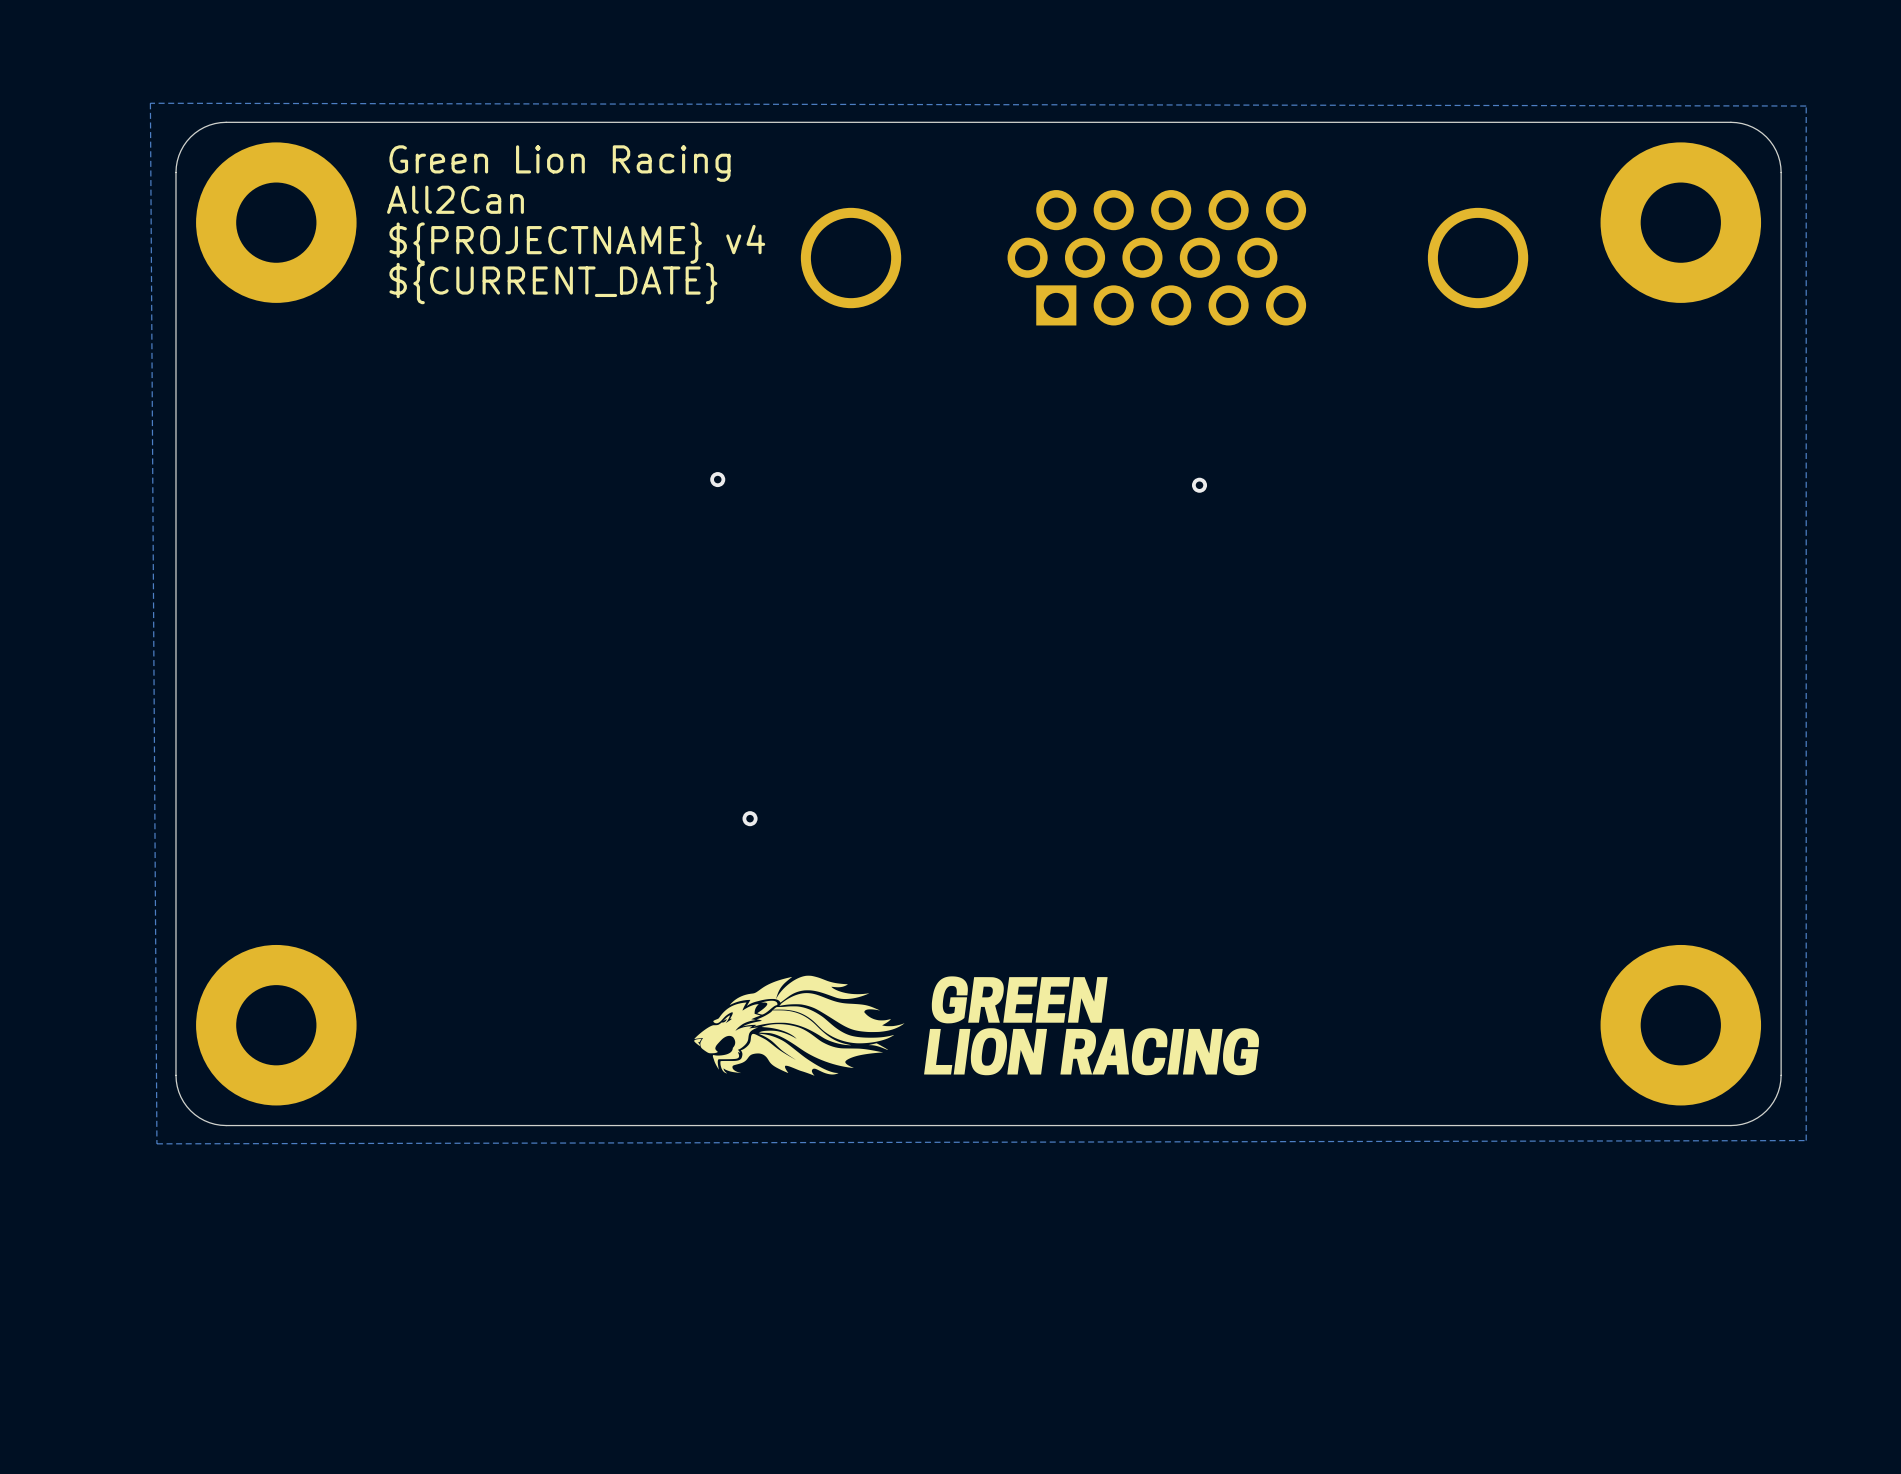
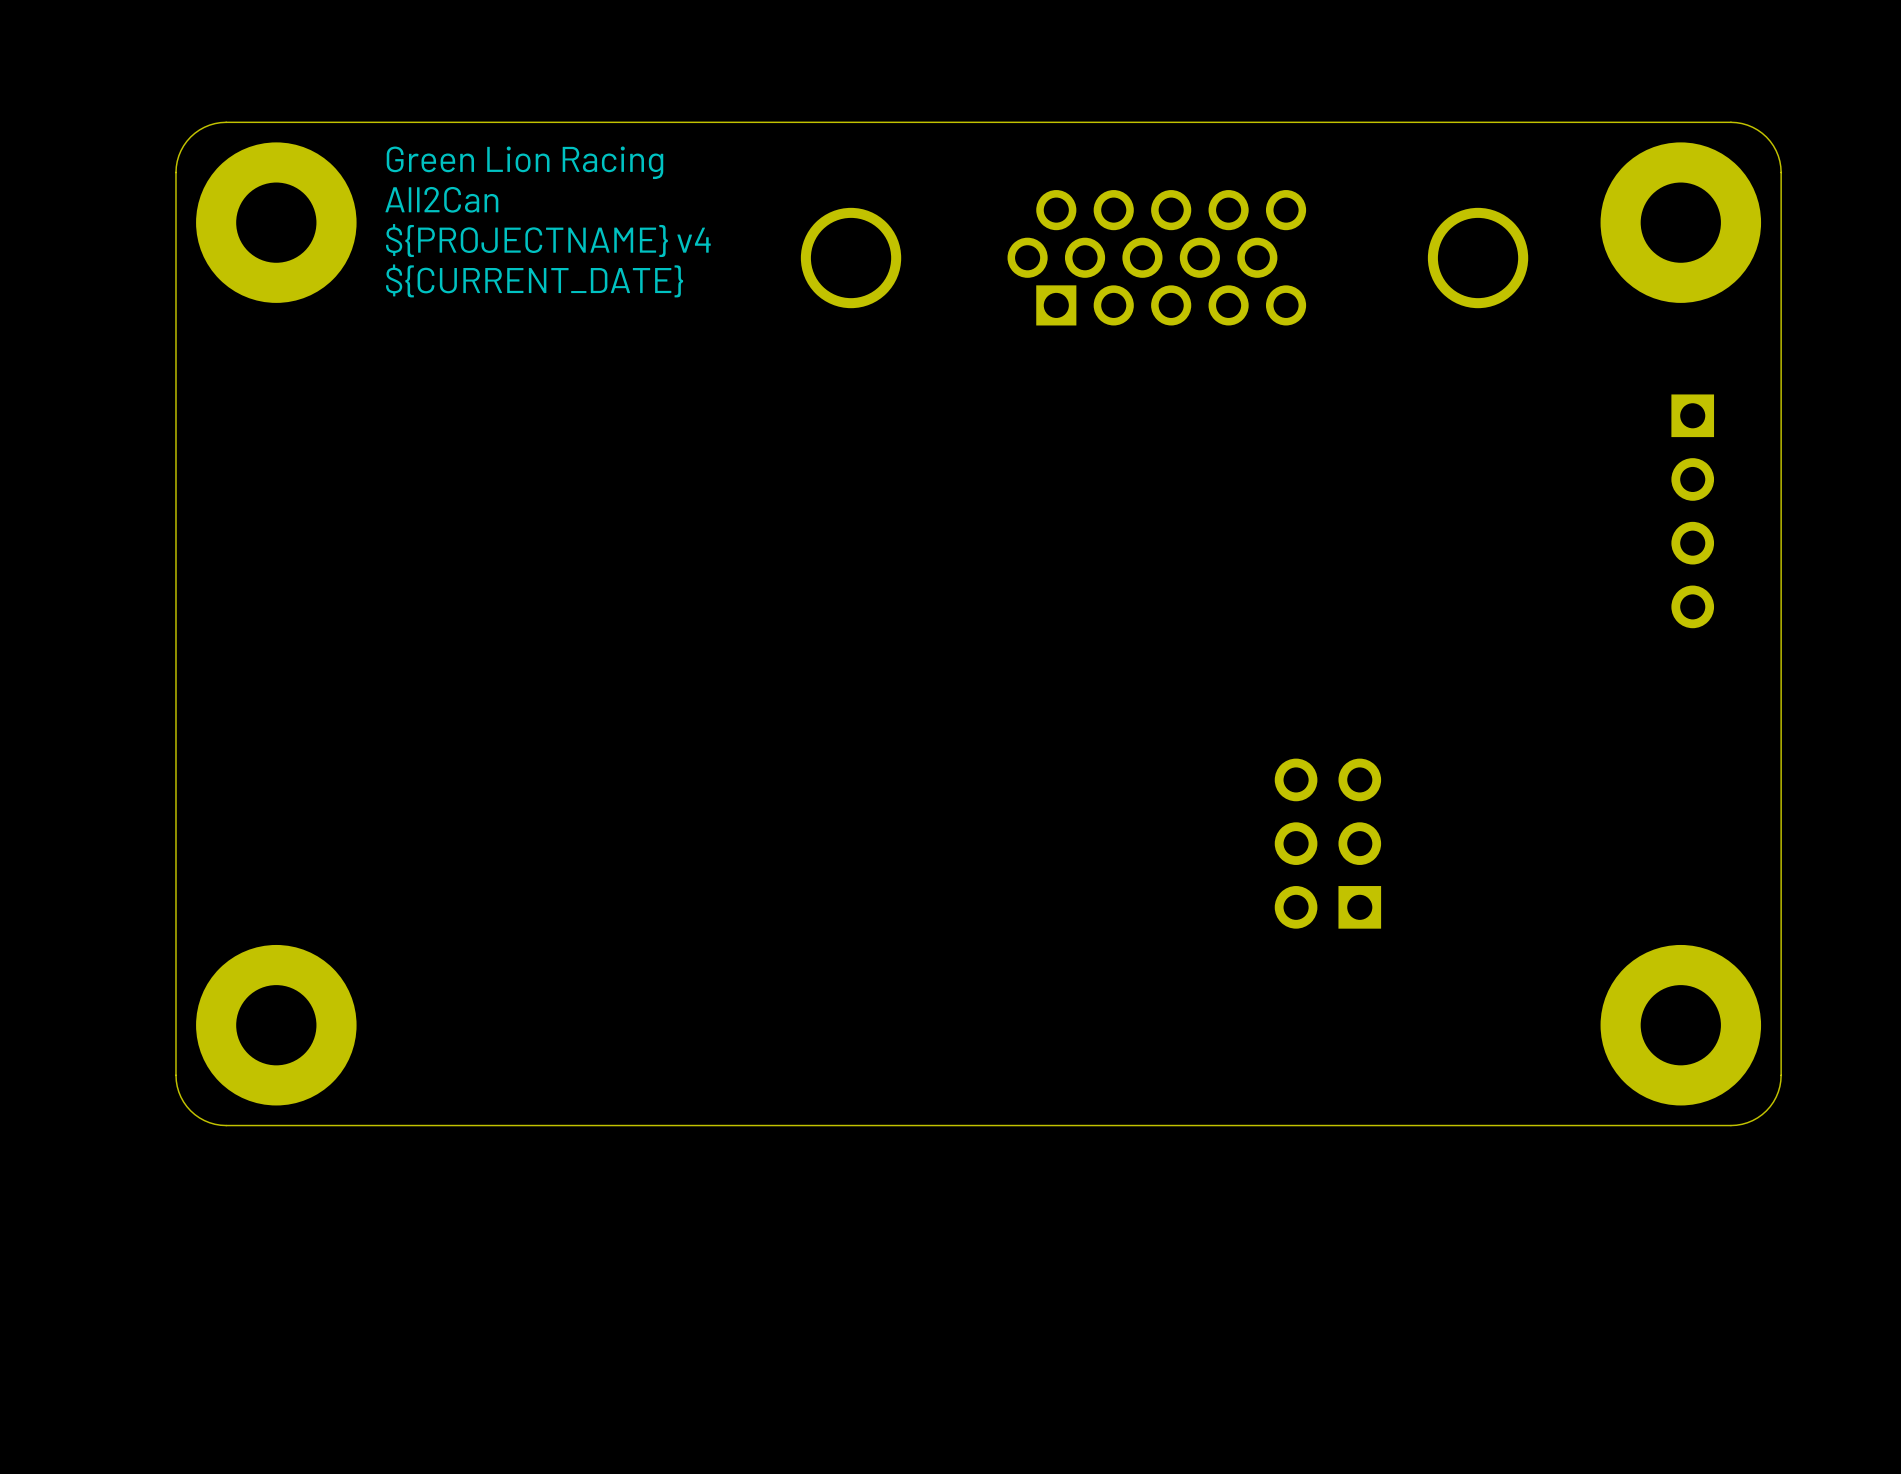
zone outline: (150, 103) (156, 1143) (1806, 1140) (1806, 106) (150, 103) -> none
via: (717, 479) -> none
via: (1199, 485) -> none
part: none -> (1692, 511)
via: (750, 818) -> none
part: none -> (1327, 843)
drawing: [694, 975, 1259, 1076] -> none

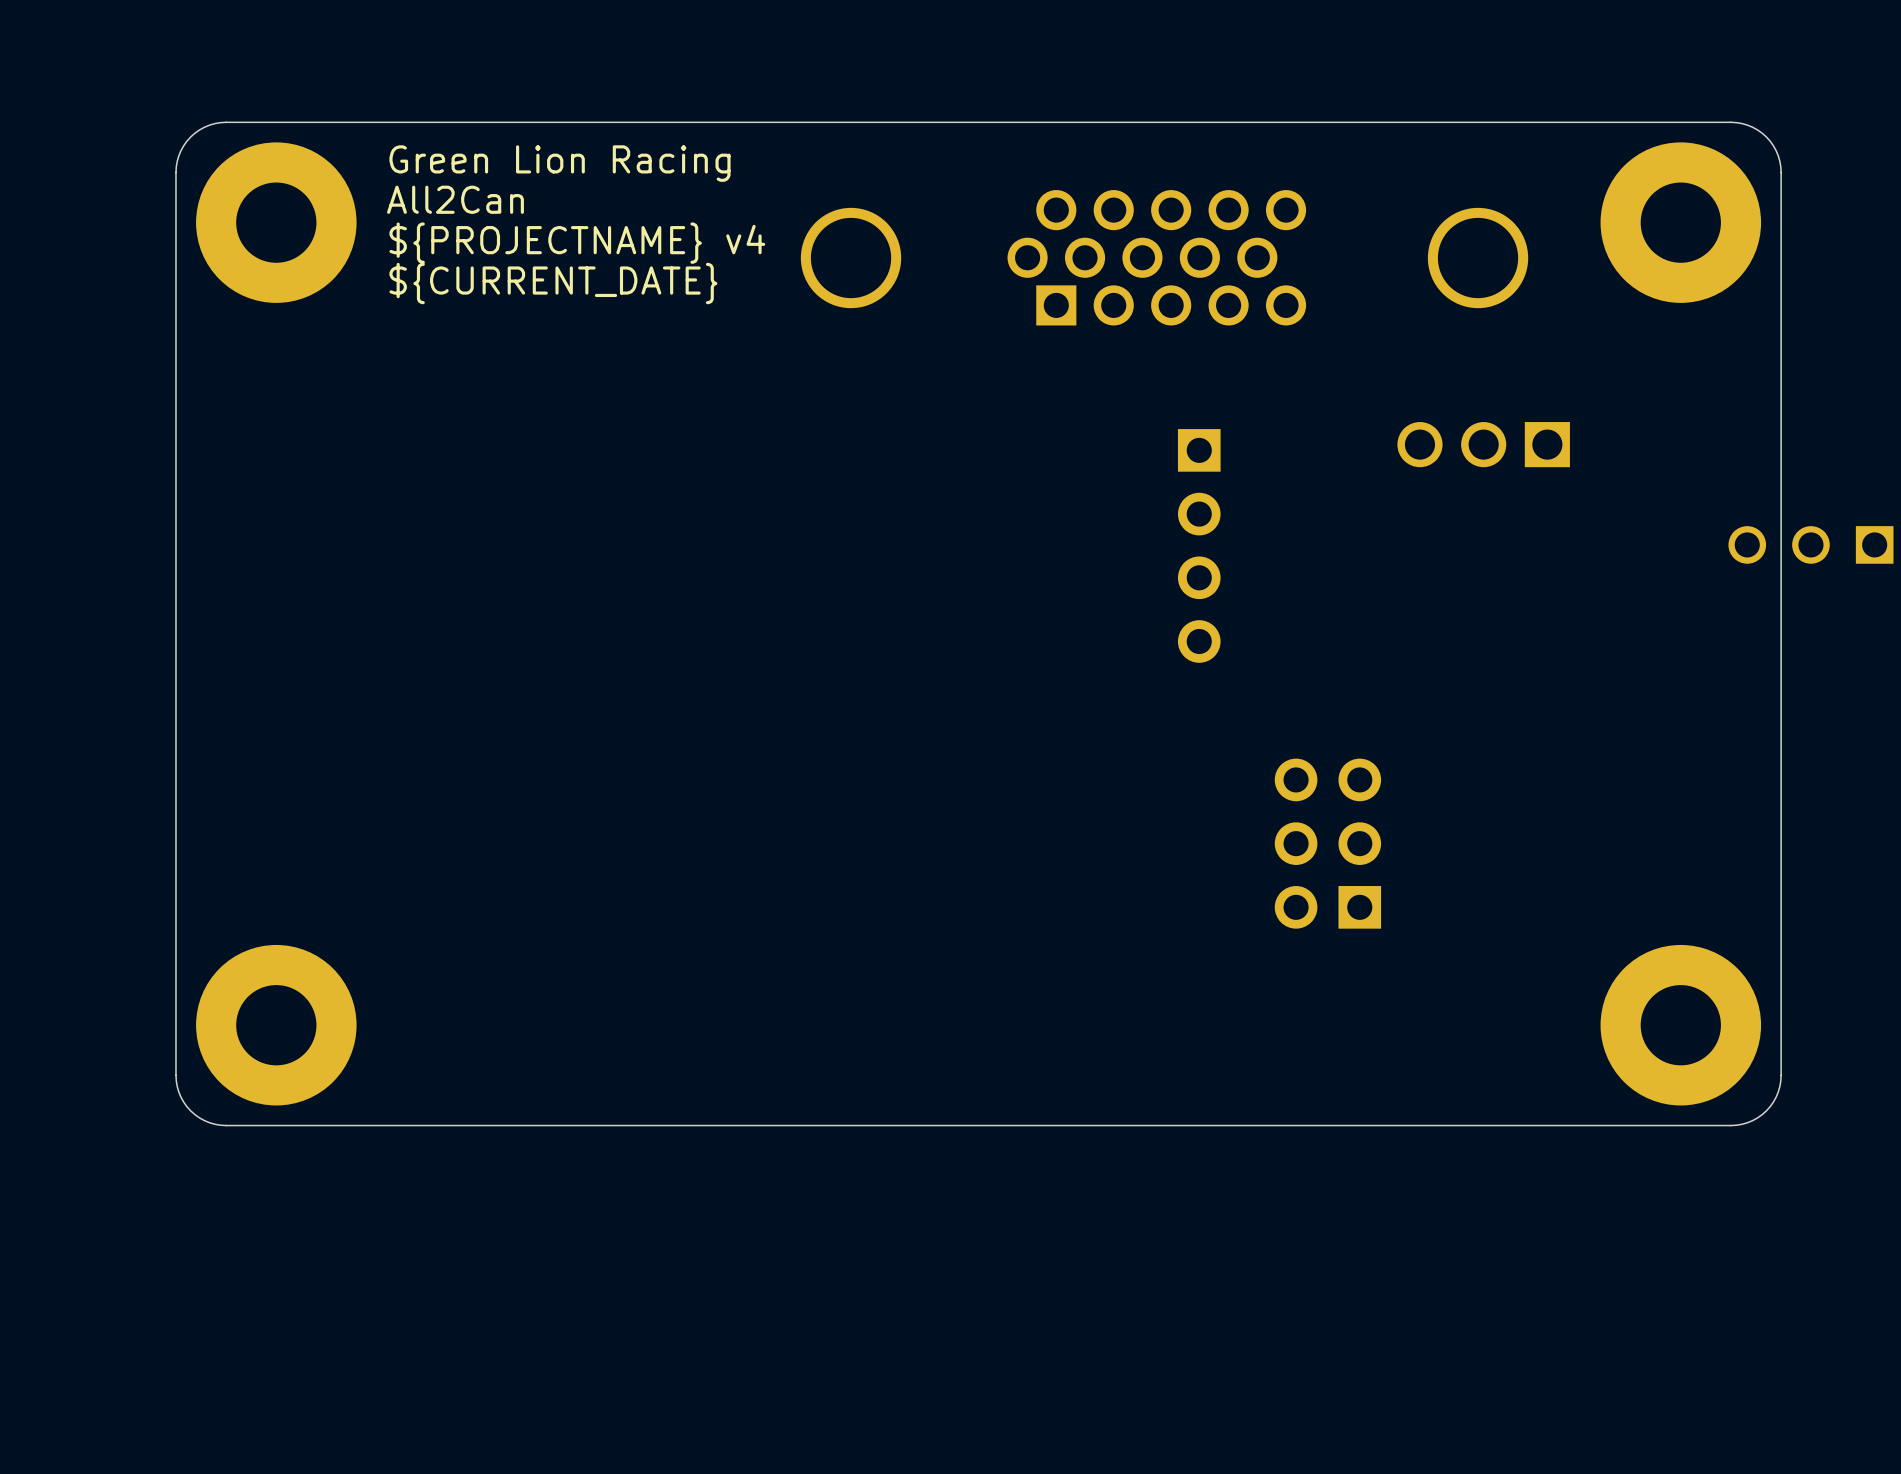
part: none -> (1483, 444)
part position: (1692, 511) -> (1199, 545)
part: none -> (1810, 544)

